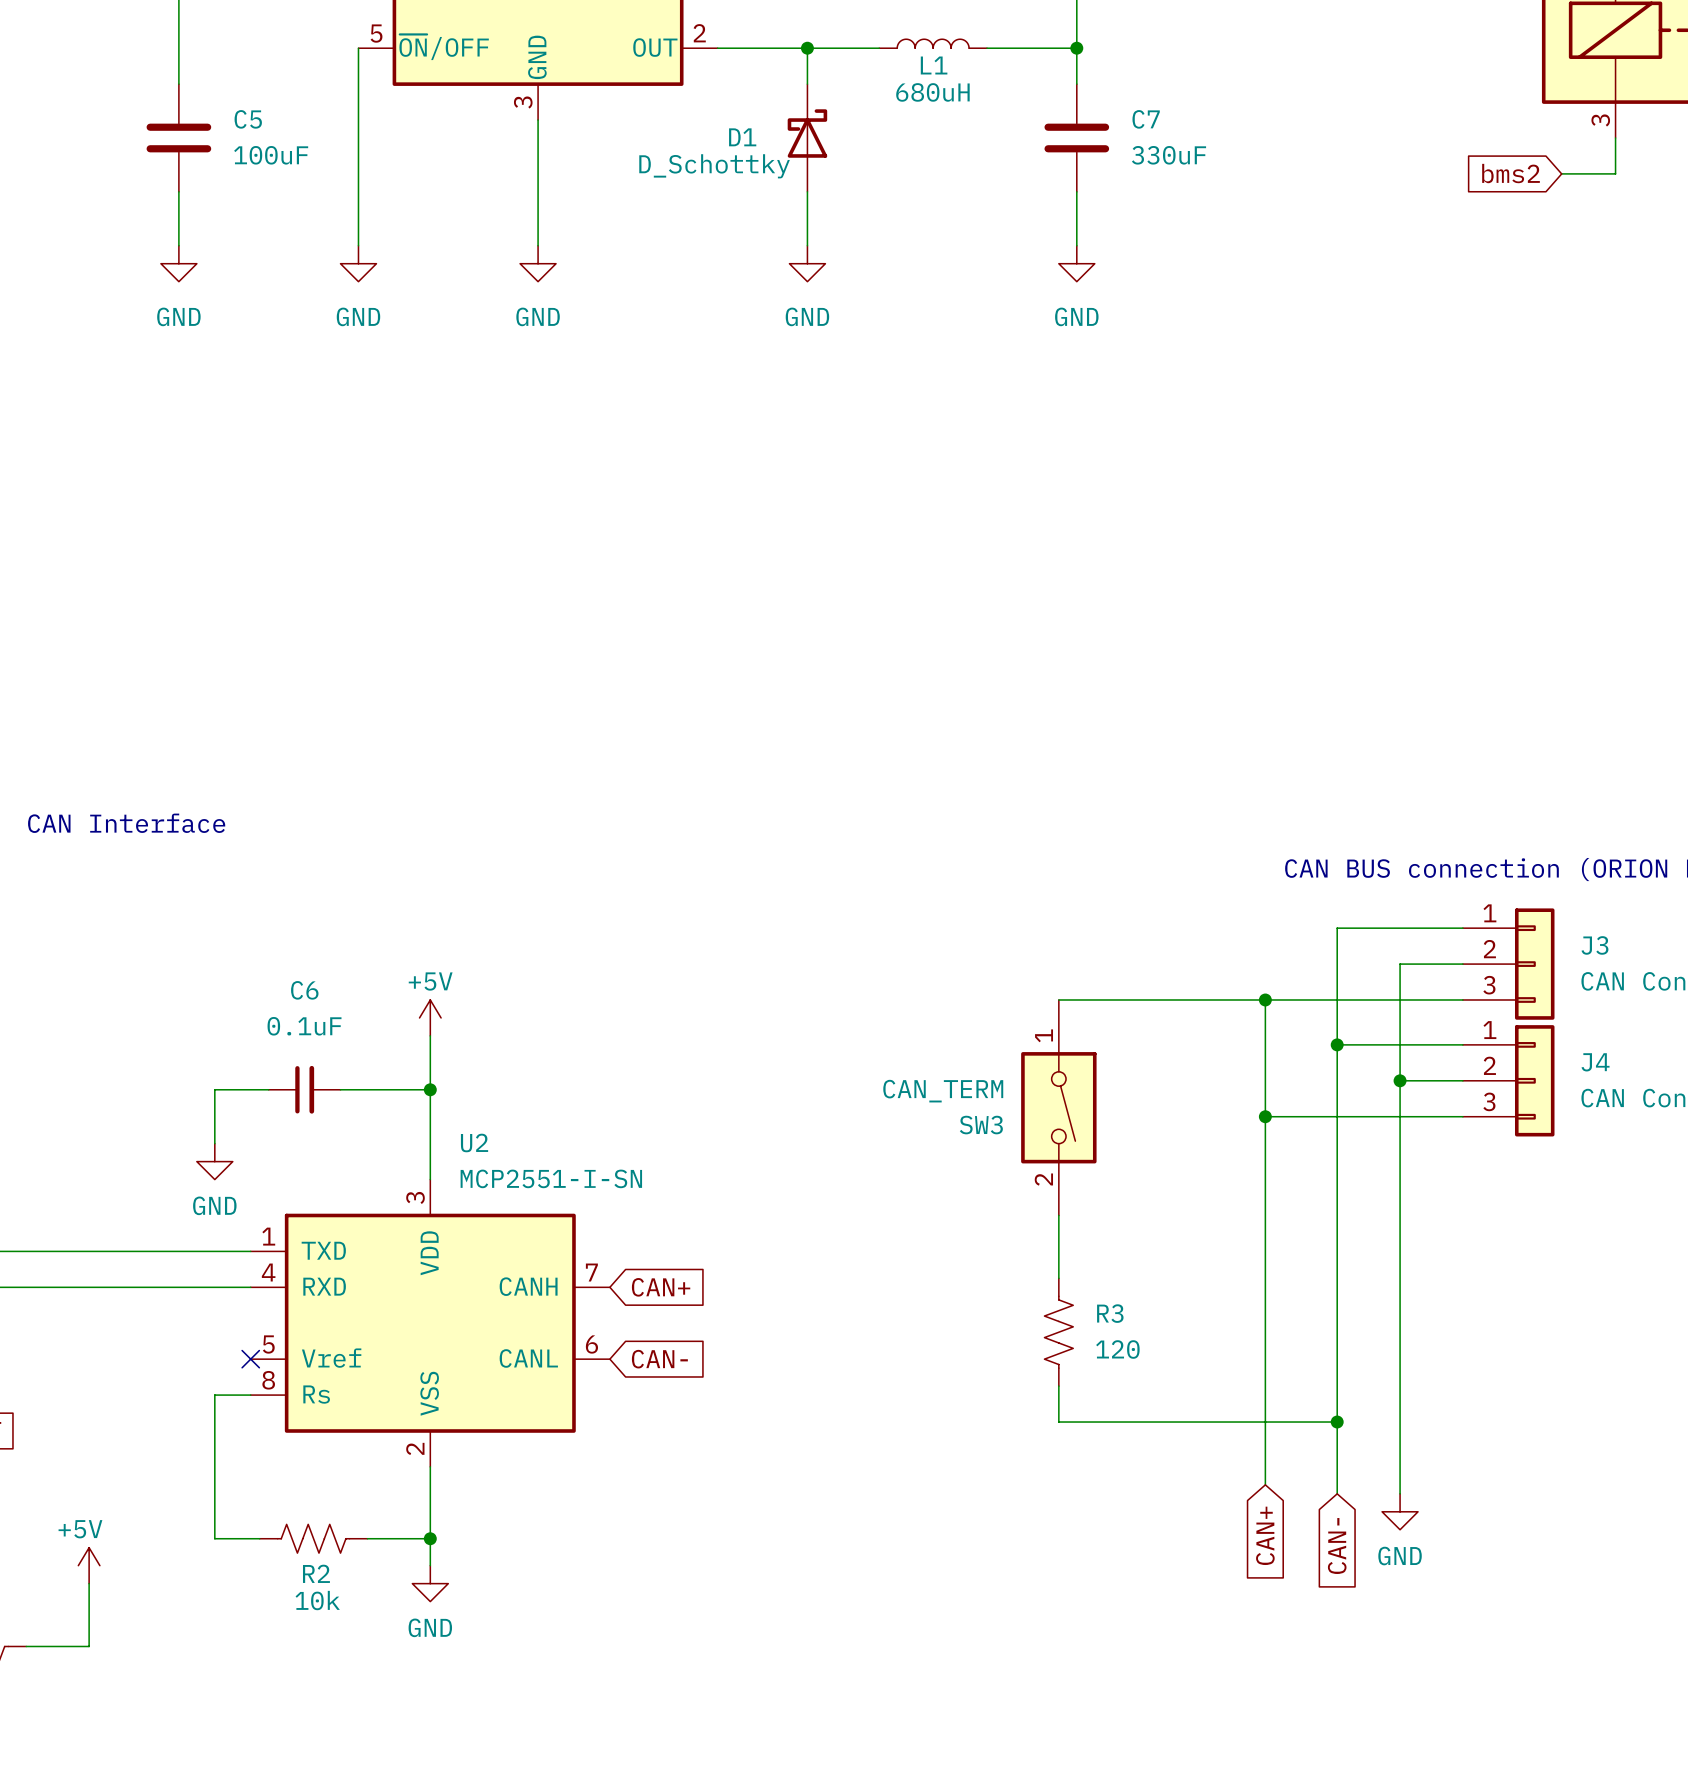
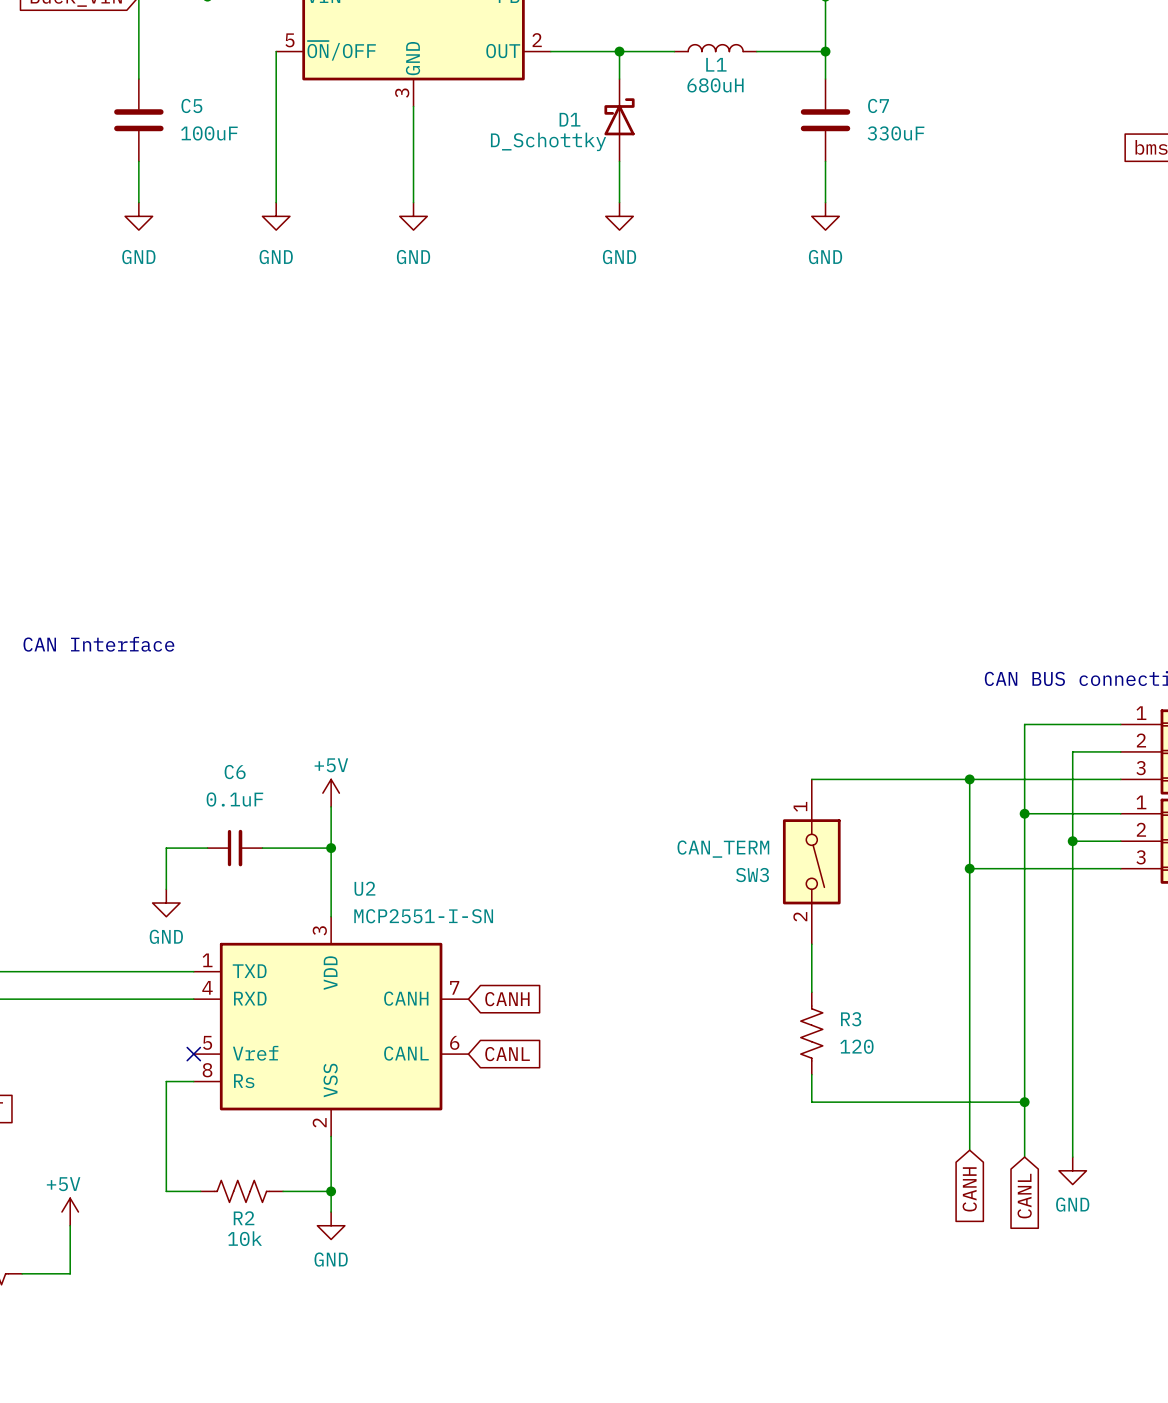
global label: CAN+ (661, 1287) -> CANH (507, 999)
global label: CAN- (659, 1359) -> CANL (507, 1054)
global label: CAN+ (1265, 1535) -> CANH (969, 1189)
global label: CAN- (1337, 1546) -> CANL (1024, 1196)

